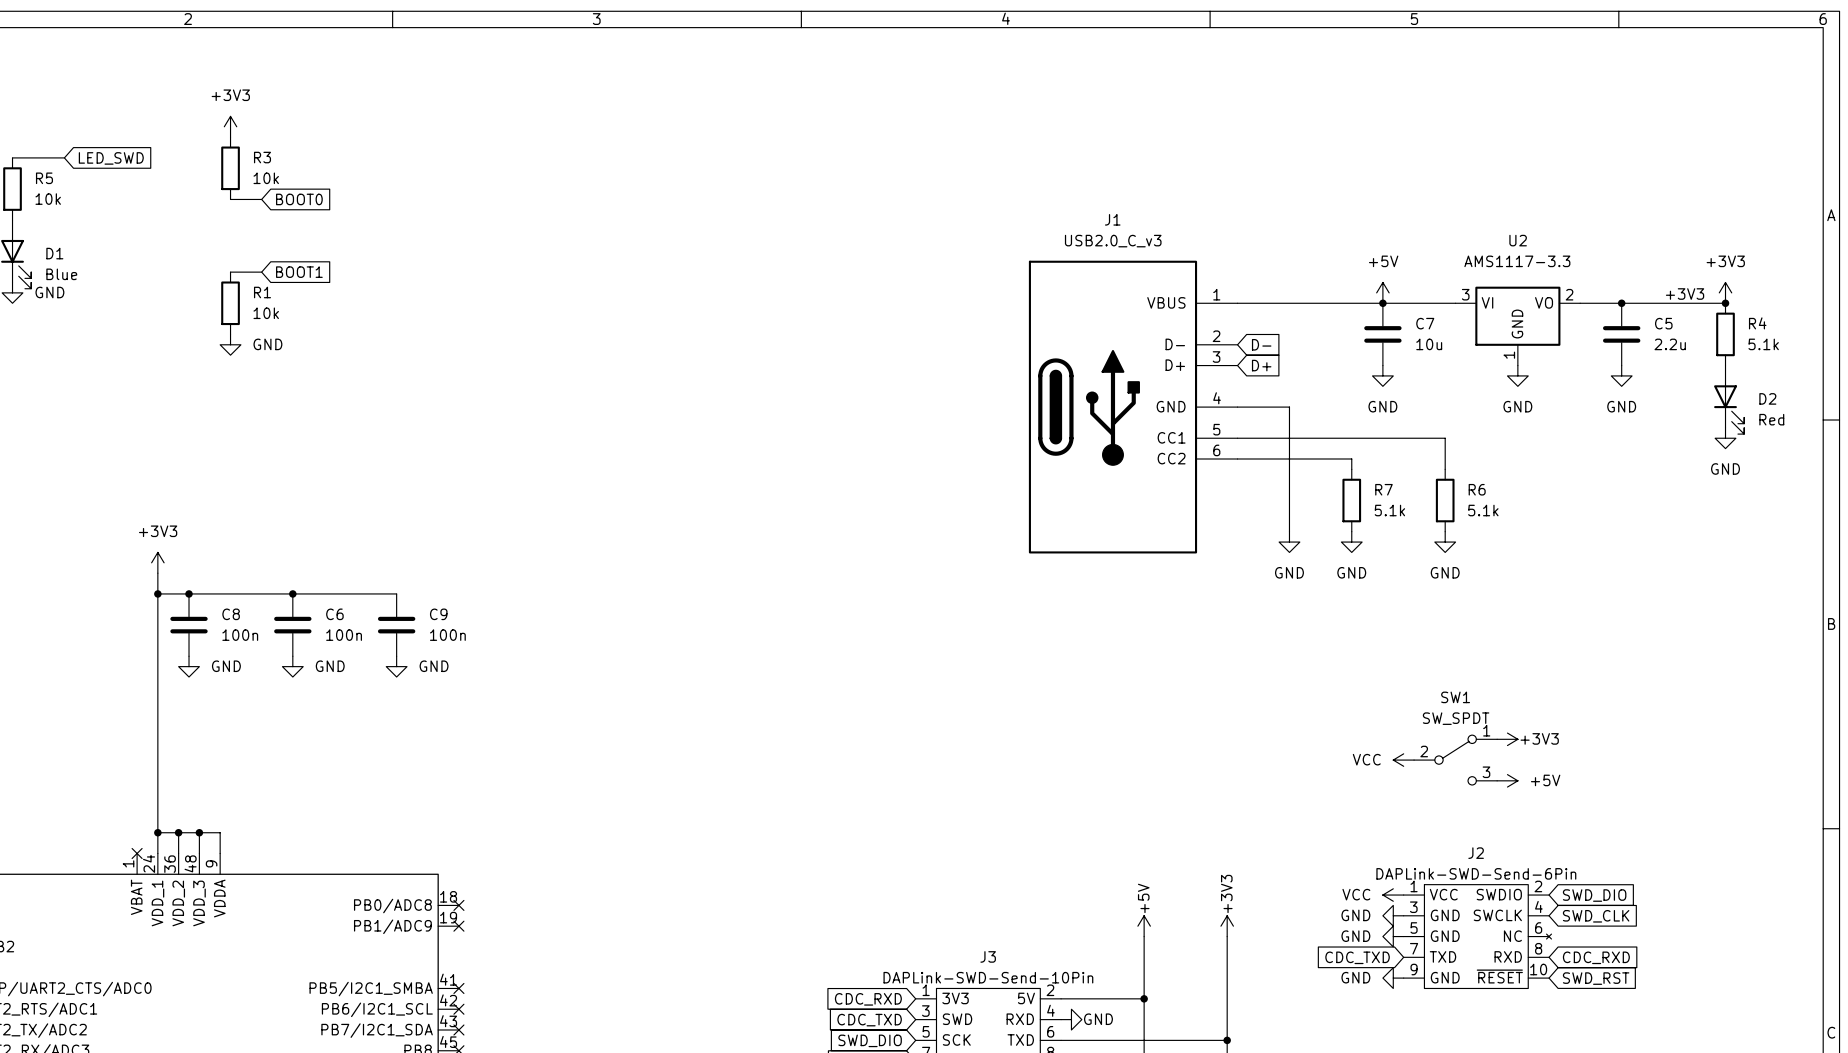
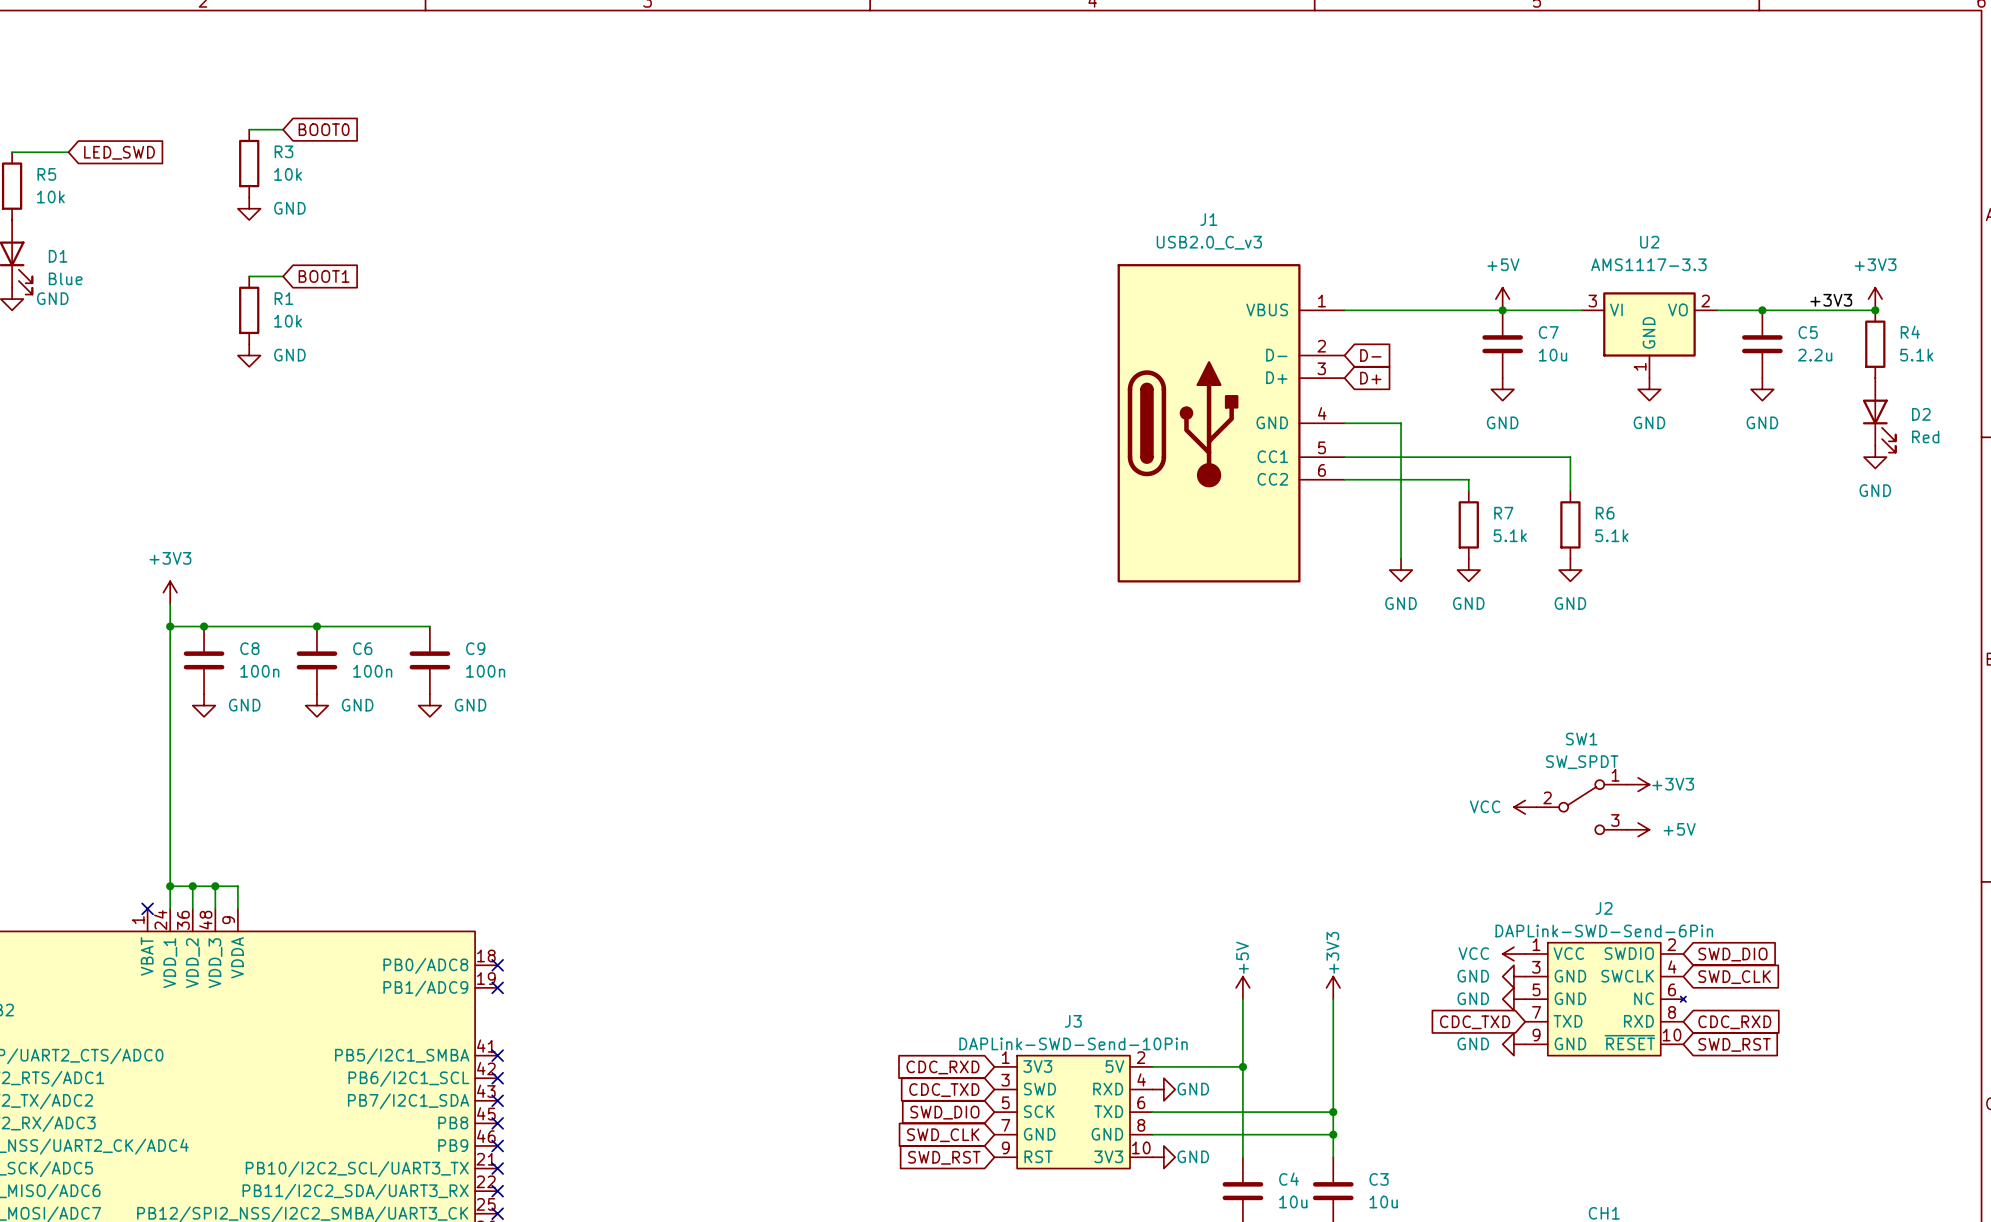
power symbol: +3V3 (230, 126) -> none
wire: (230, 199) (261, 199) -> (249, 129) (283, 129)
global label position: BOOT0 (299, 199) -> BOOT0 (324, 129)
power symbol: none -> GND (249, 208)

